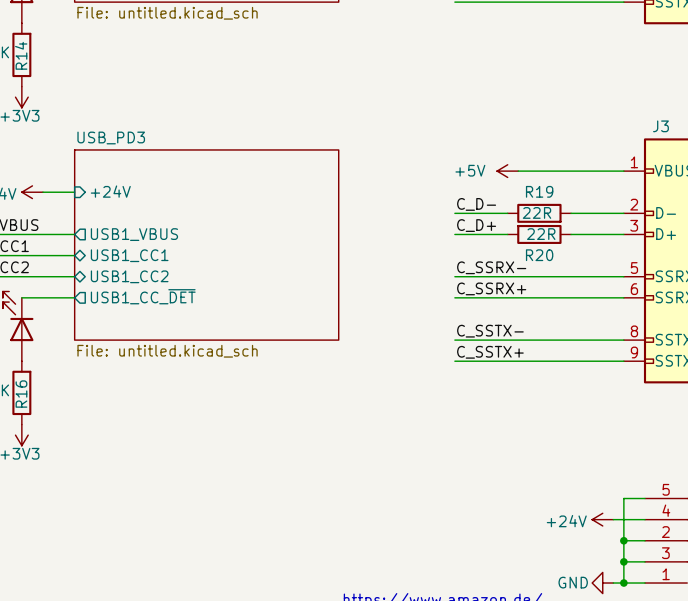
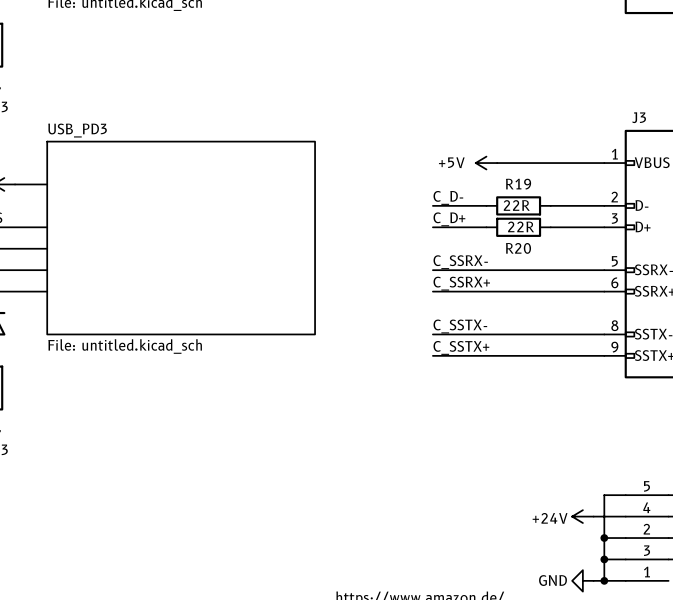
sheet pin: +24V (110, 191) -> none
sheet pin: USB1_VBUS (134, 234) -> none
sheet pin: USB1_CC1 (129, 255) -> none
sheet pin: USB1_CC2 (129, 276) -> none
sheet pin: USB1_CC_~{DET} (143, 296) -> none

